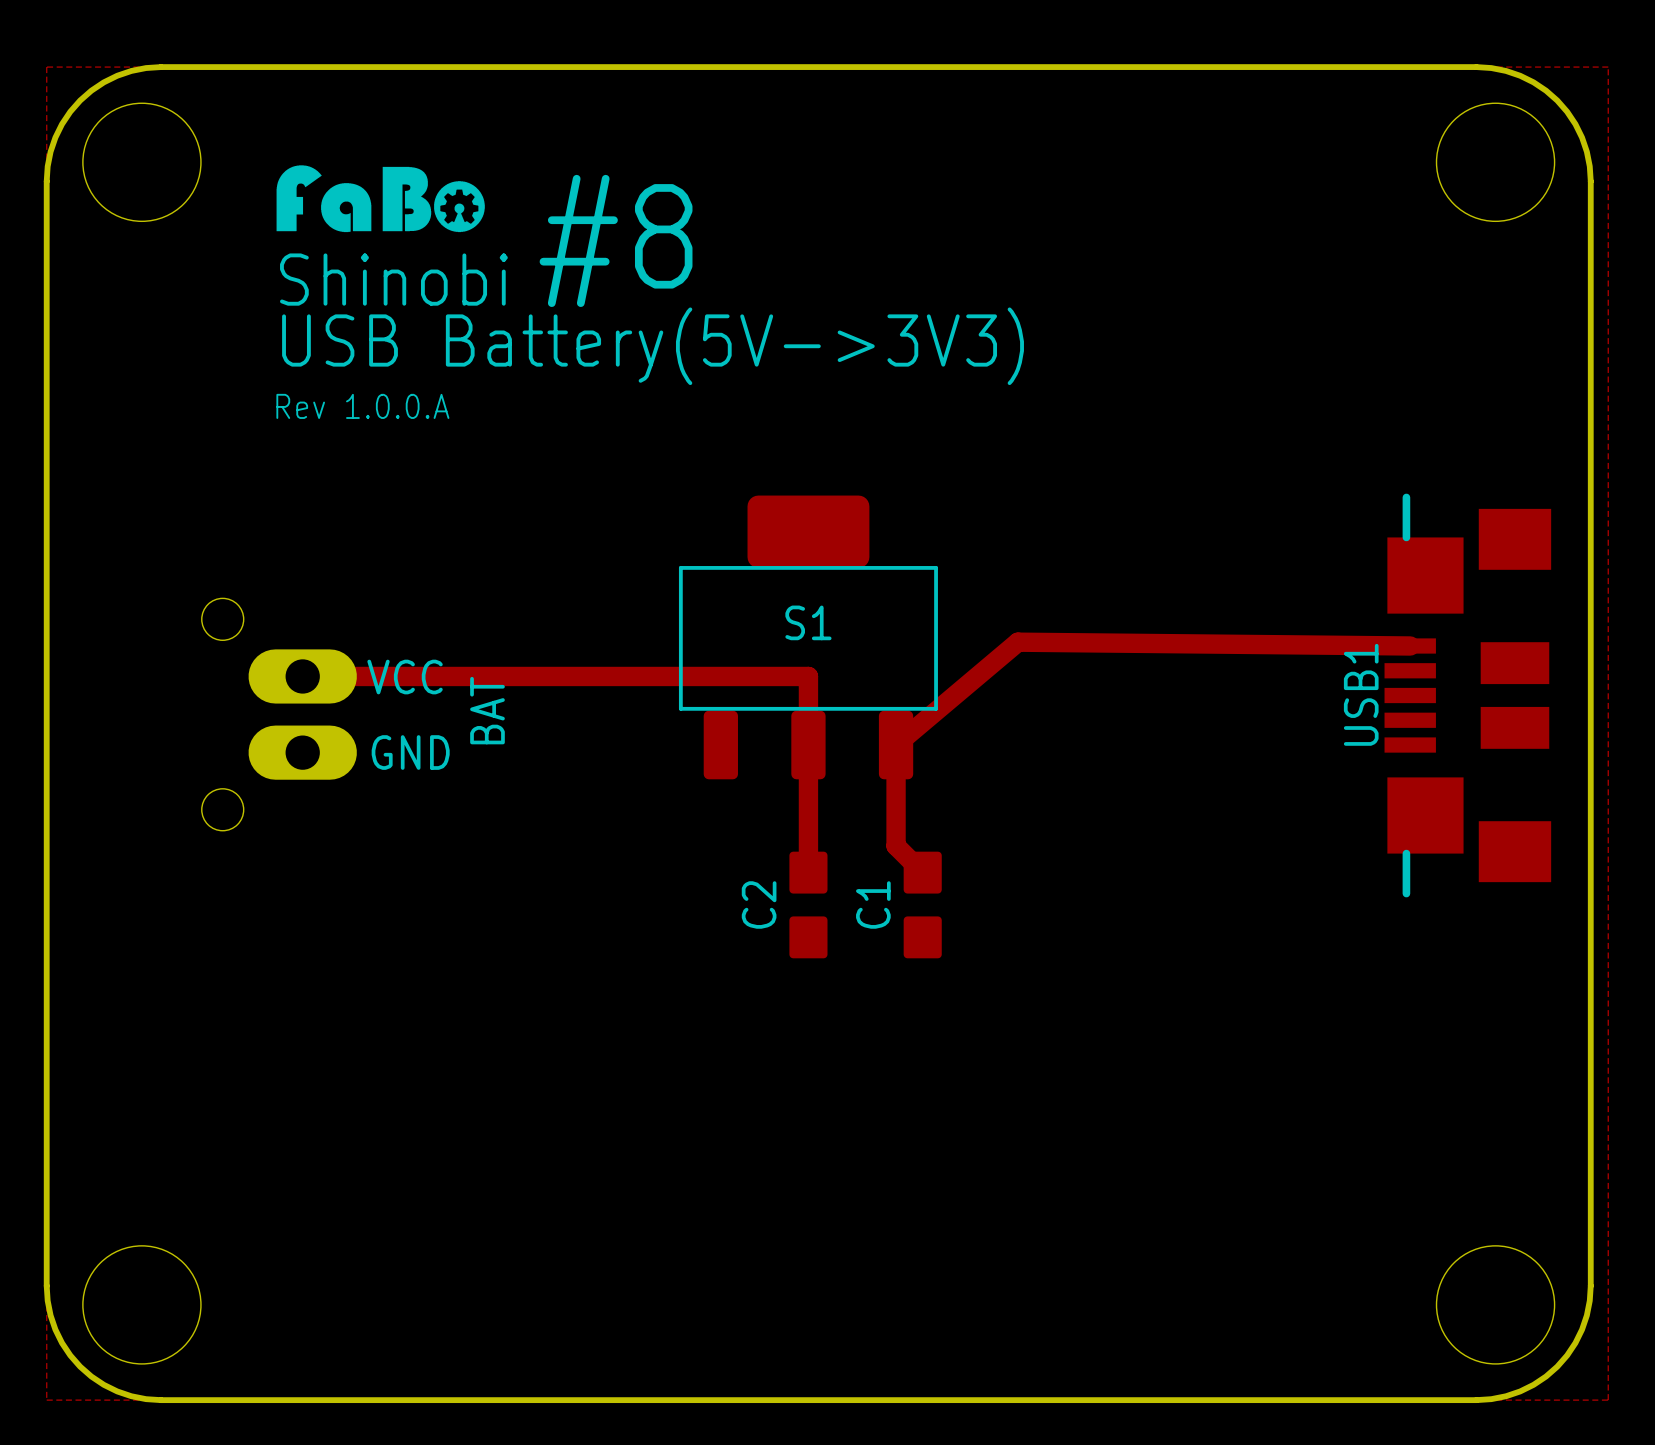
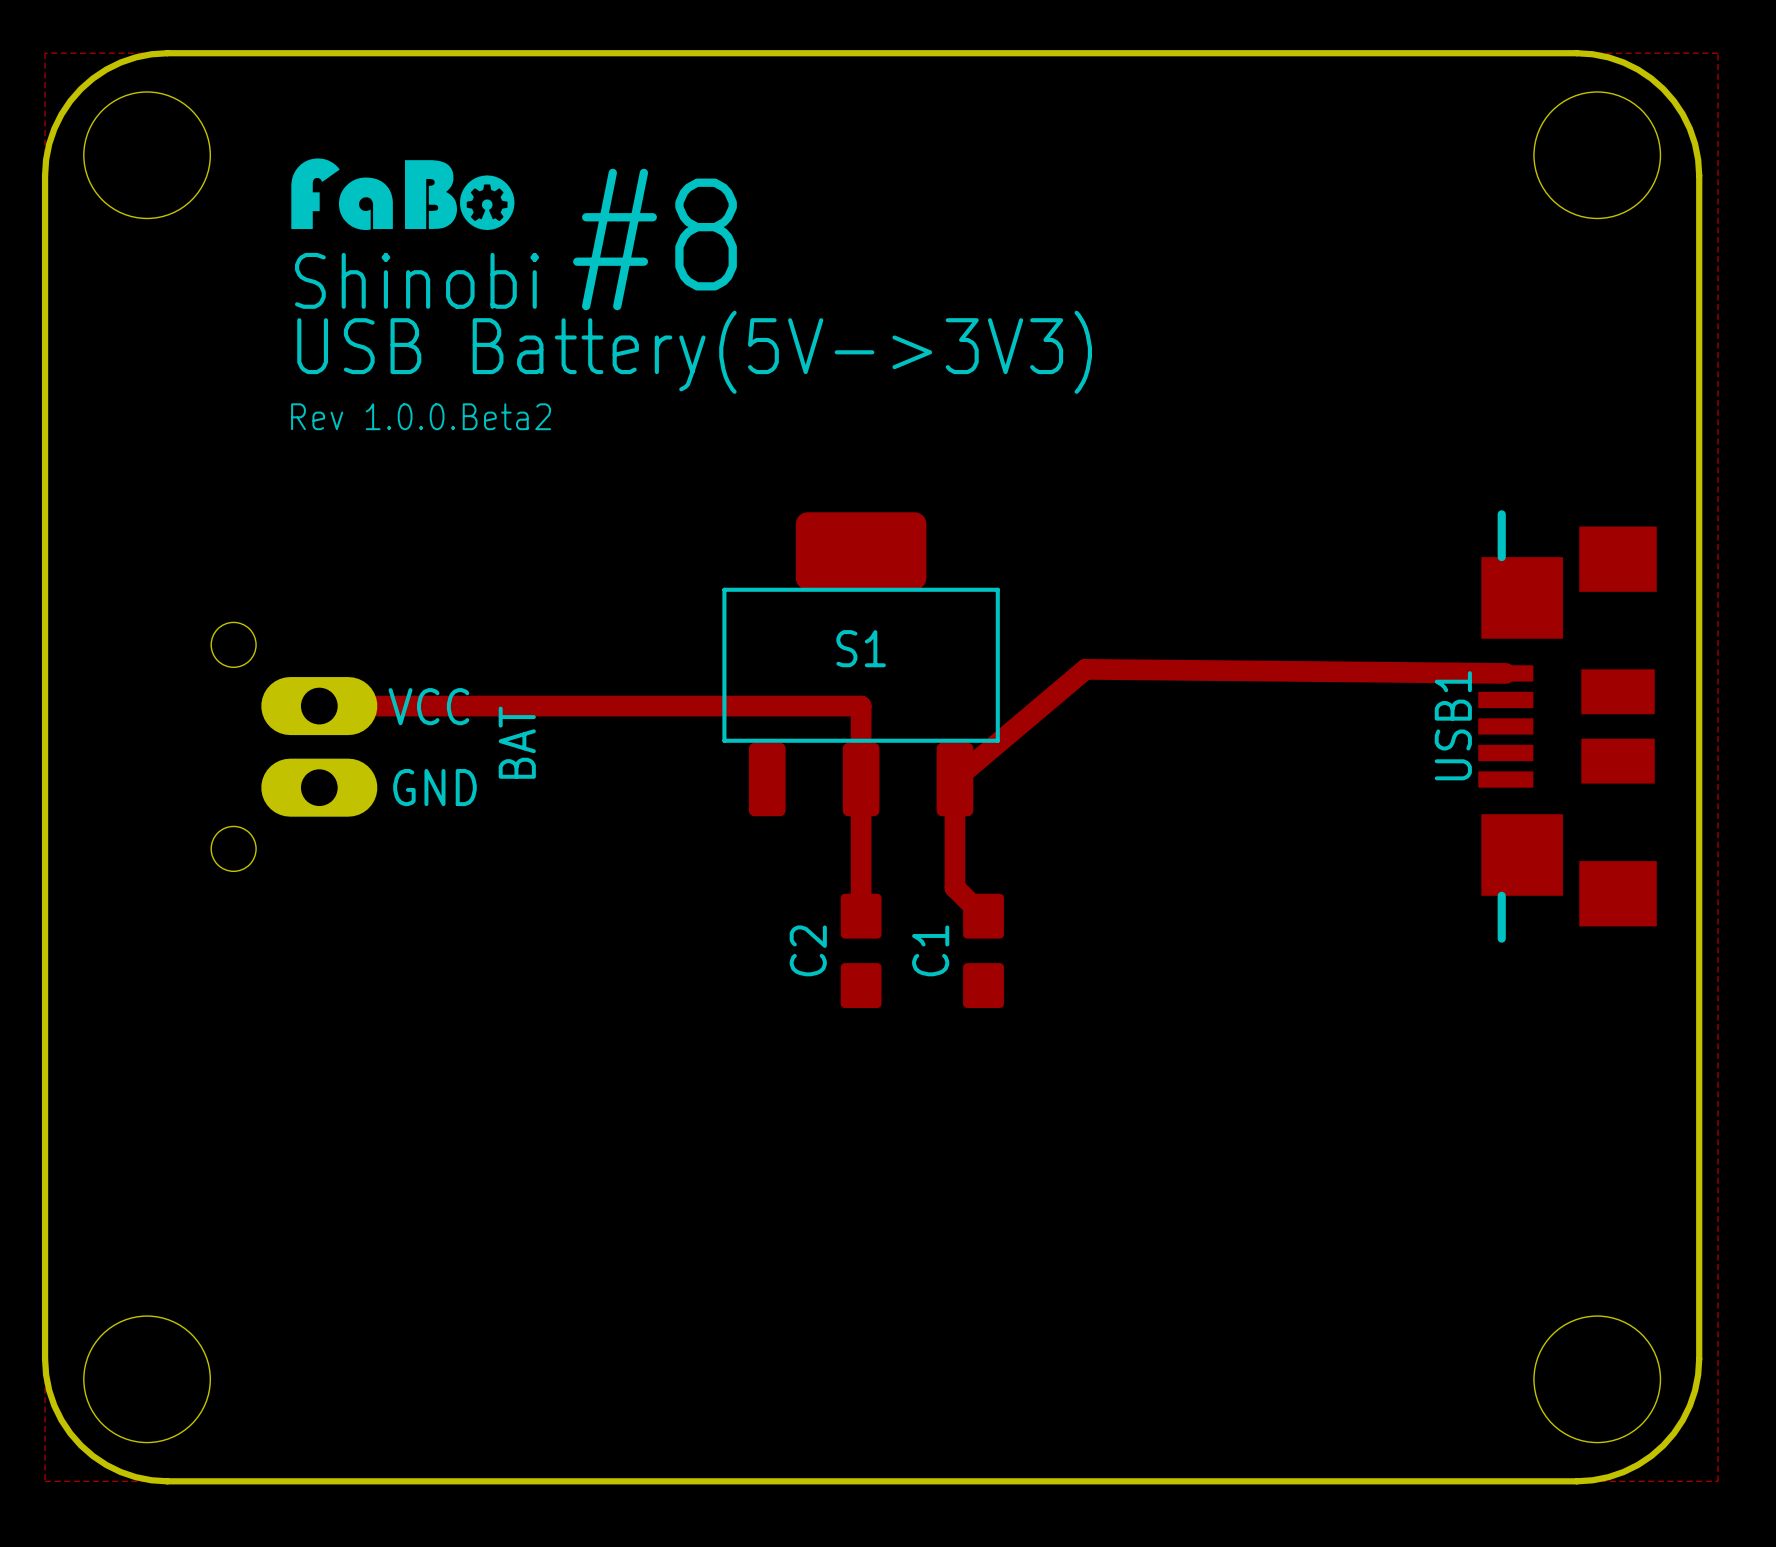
text: Rev 1.0.0.A (362, 406) -> Rev 1.0.0.Beta2 (421, 416)

